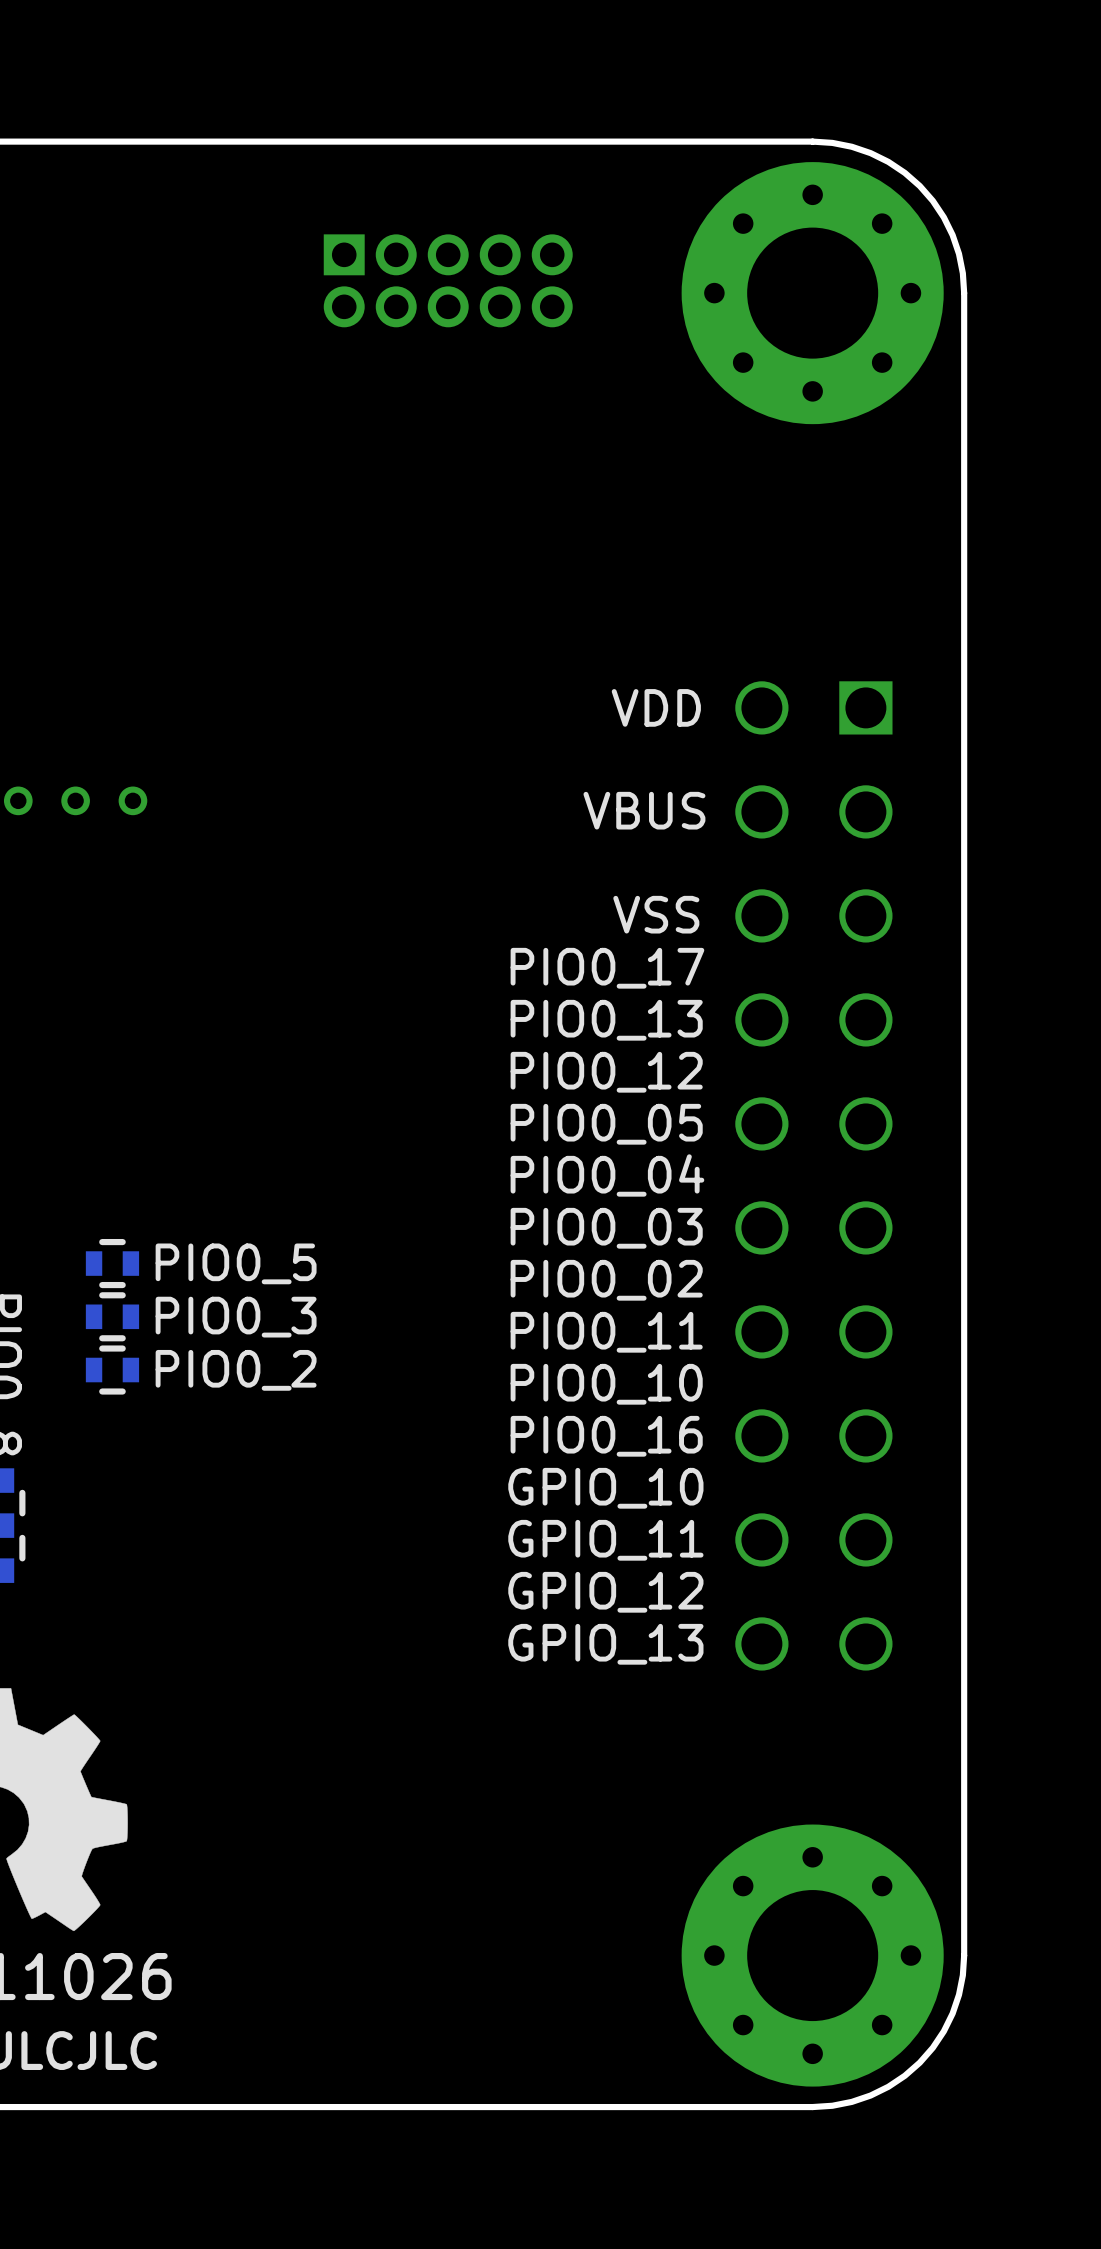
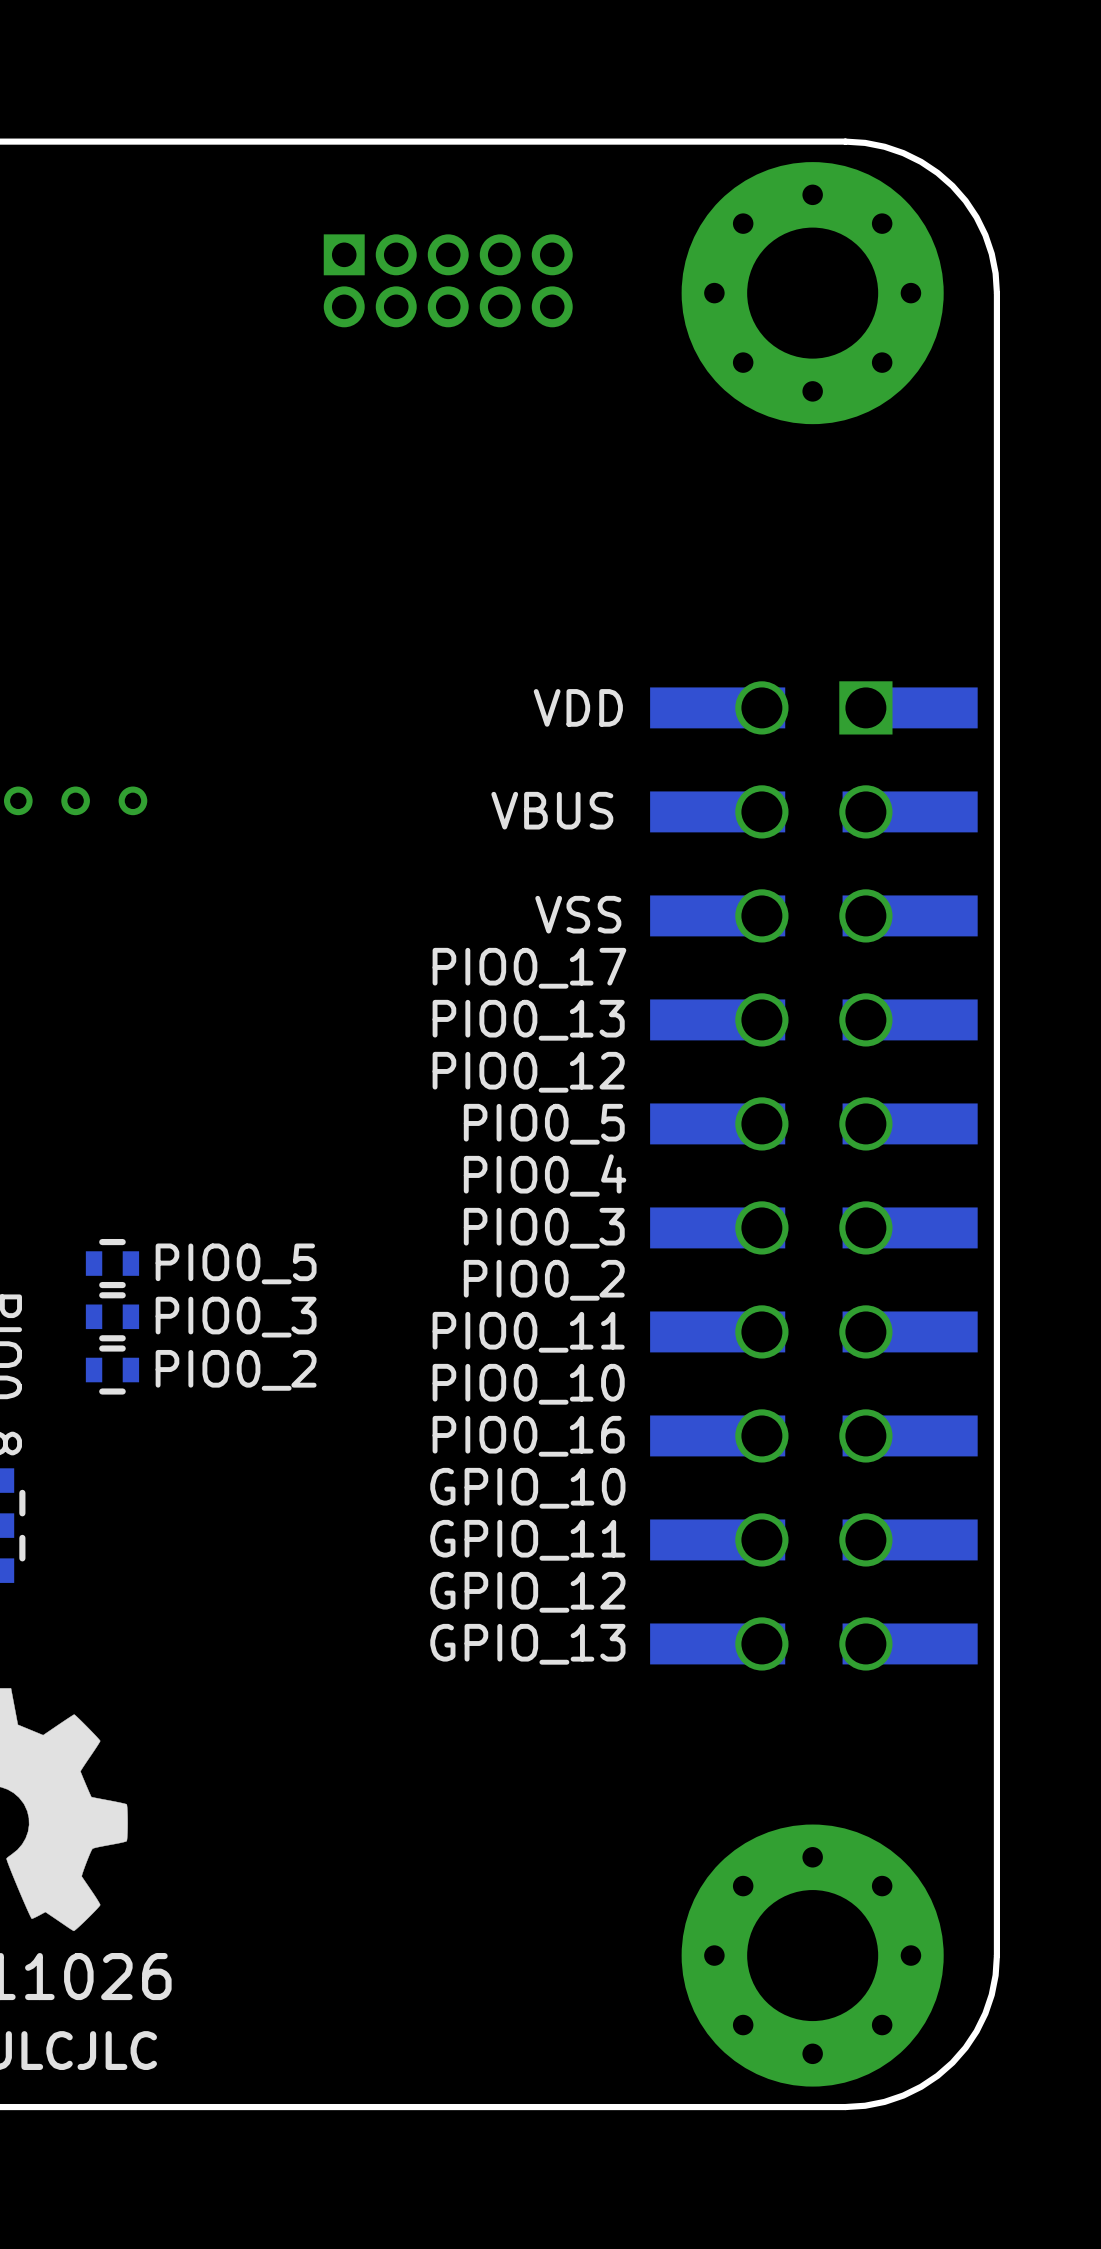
board edge: (812, 141) (851, 146) (870, 153) (888, 161) (919, 185) (943, 217) (952, 235) (959, 253) (964, 293) (962, 1975) (952, 2013) (943, 2031) (919, 2062) (904, 2075) (870, 2095) (832, 2105) (812, 2107) -> (812, 141) (865, 142) (884, 146) (903, 153) (937, 172) (952, 185) (976, 217) (985, 235) (995, 273) (996, 1955) (995, 1975) (985, 2013) (965, 2047) (937, 2075) (921, 2086) (884, 2101) (865, 2105) (812, 2107)
part footprint: [735, 681, 893, 1671] -> [650, 681, 978, 1671]

